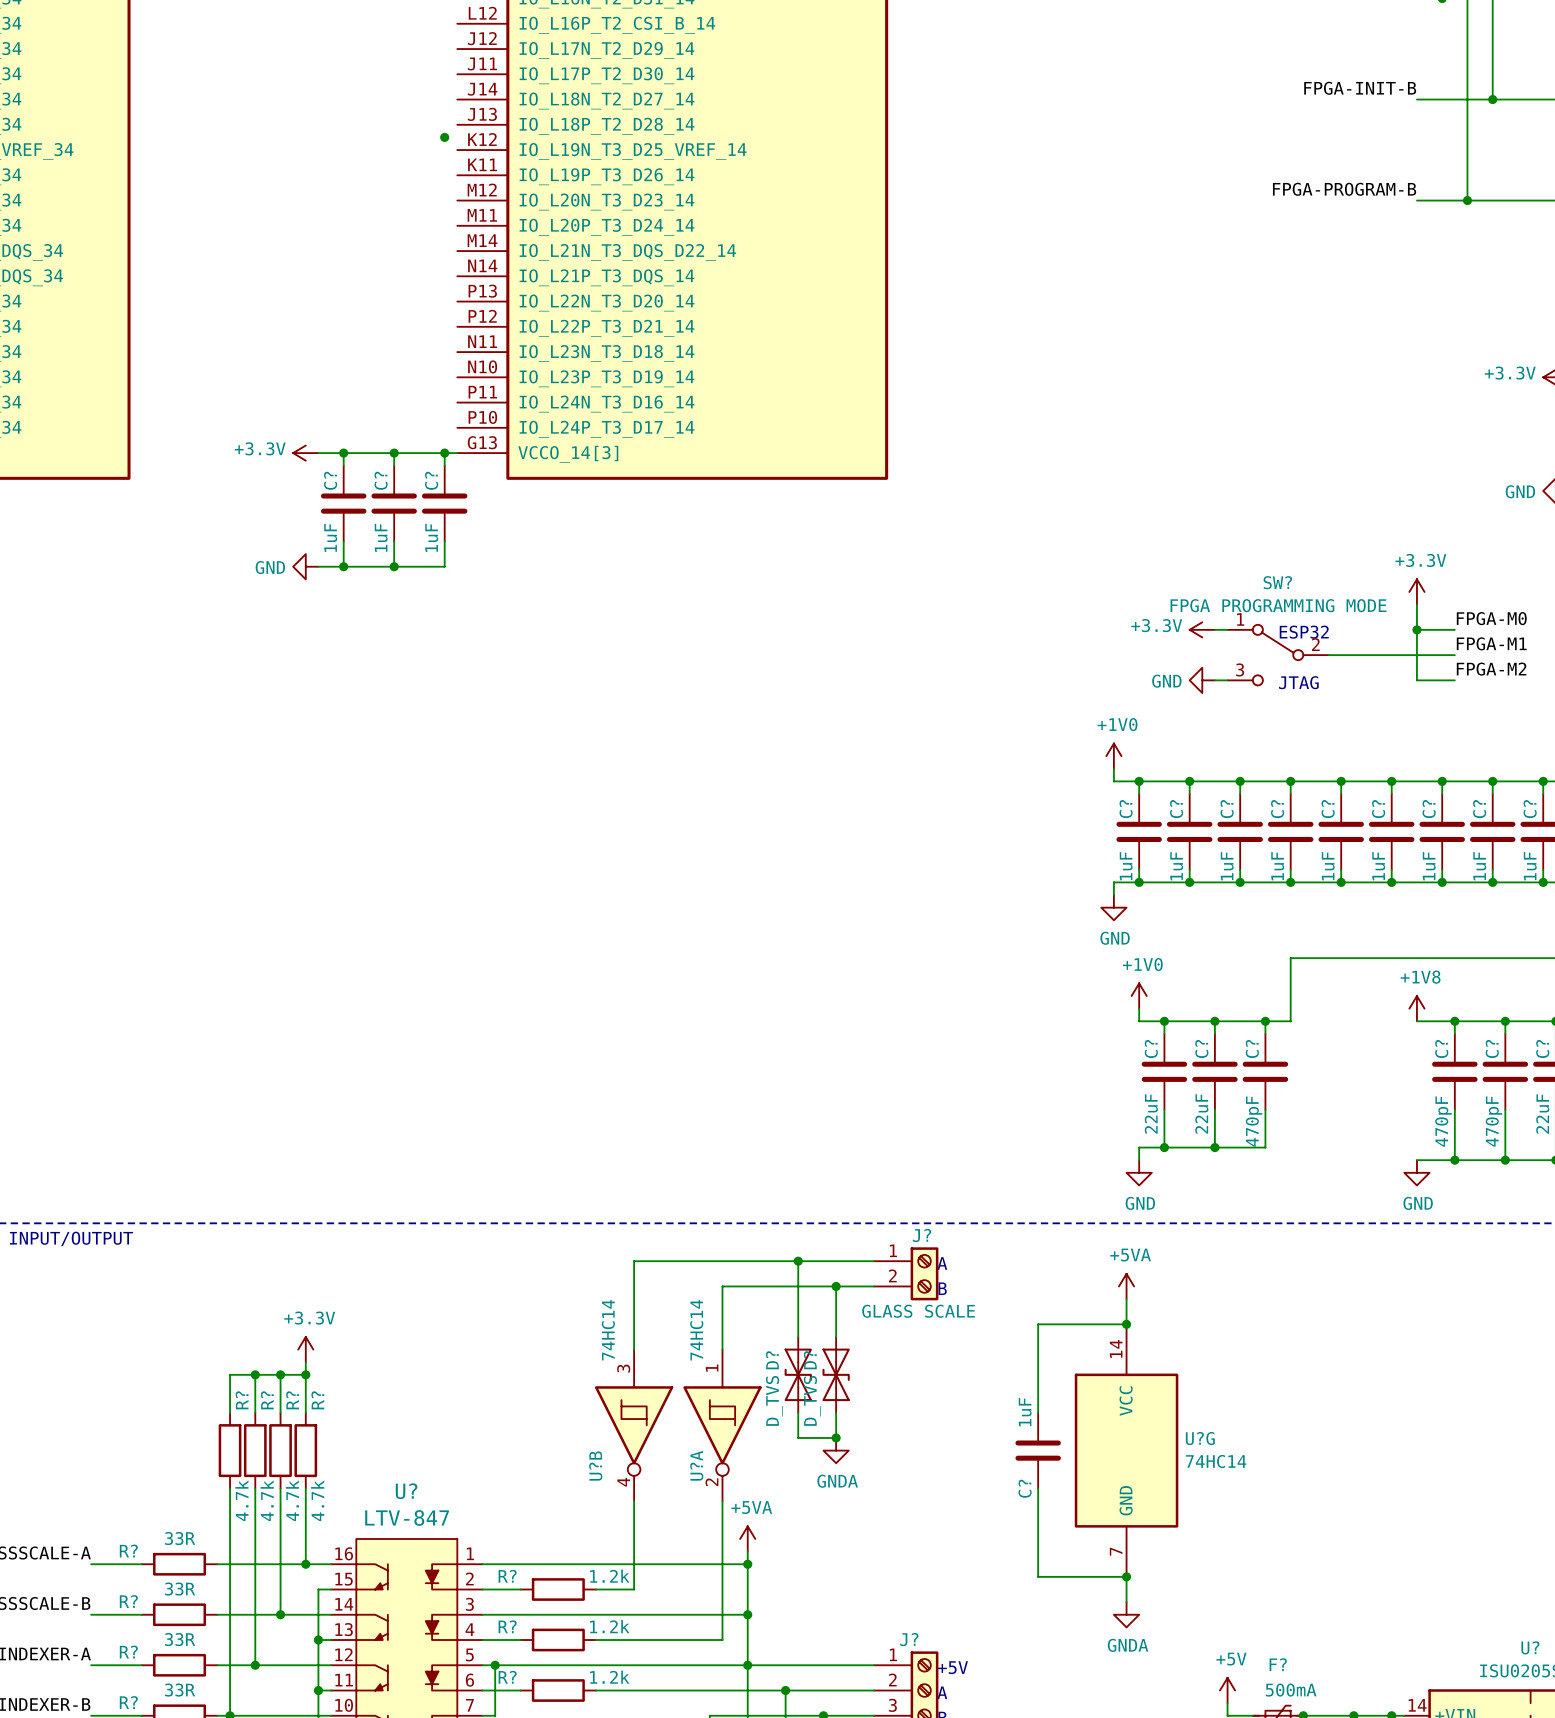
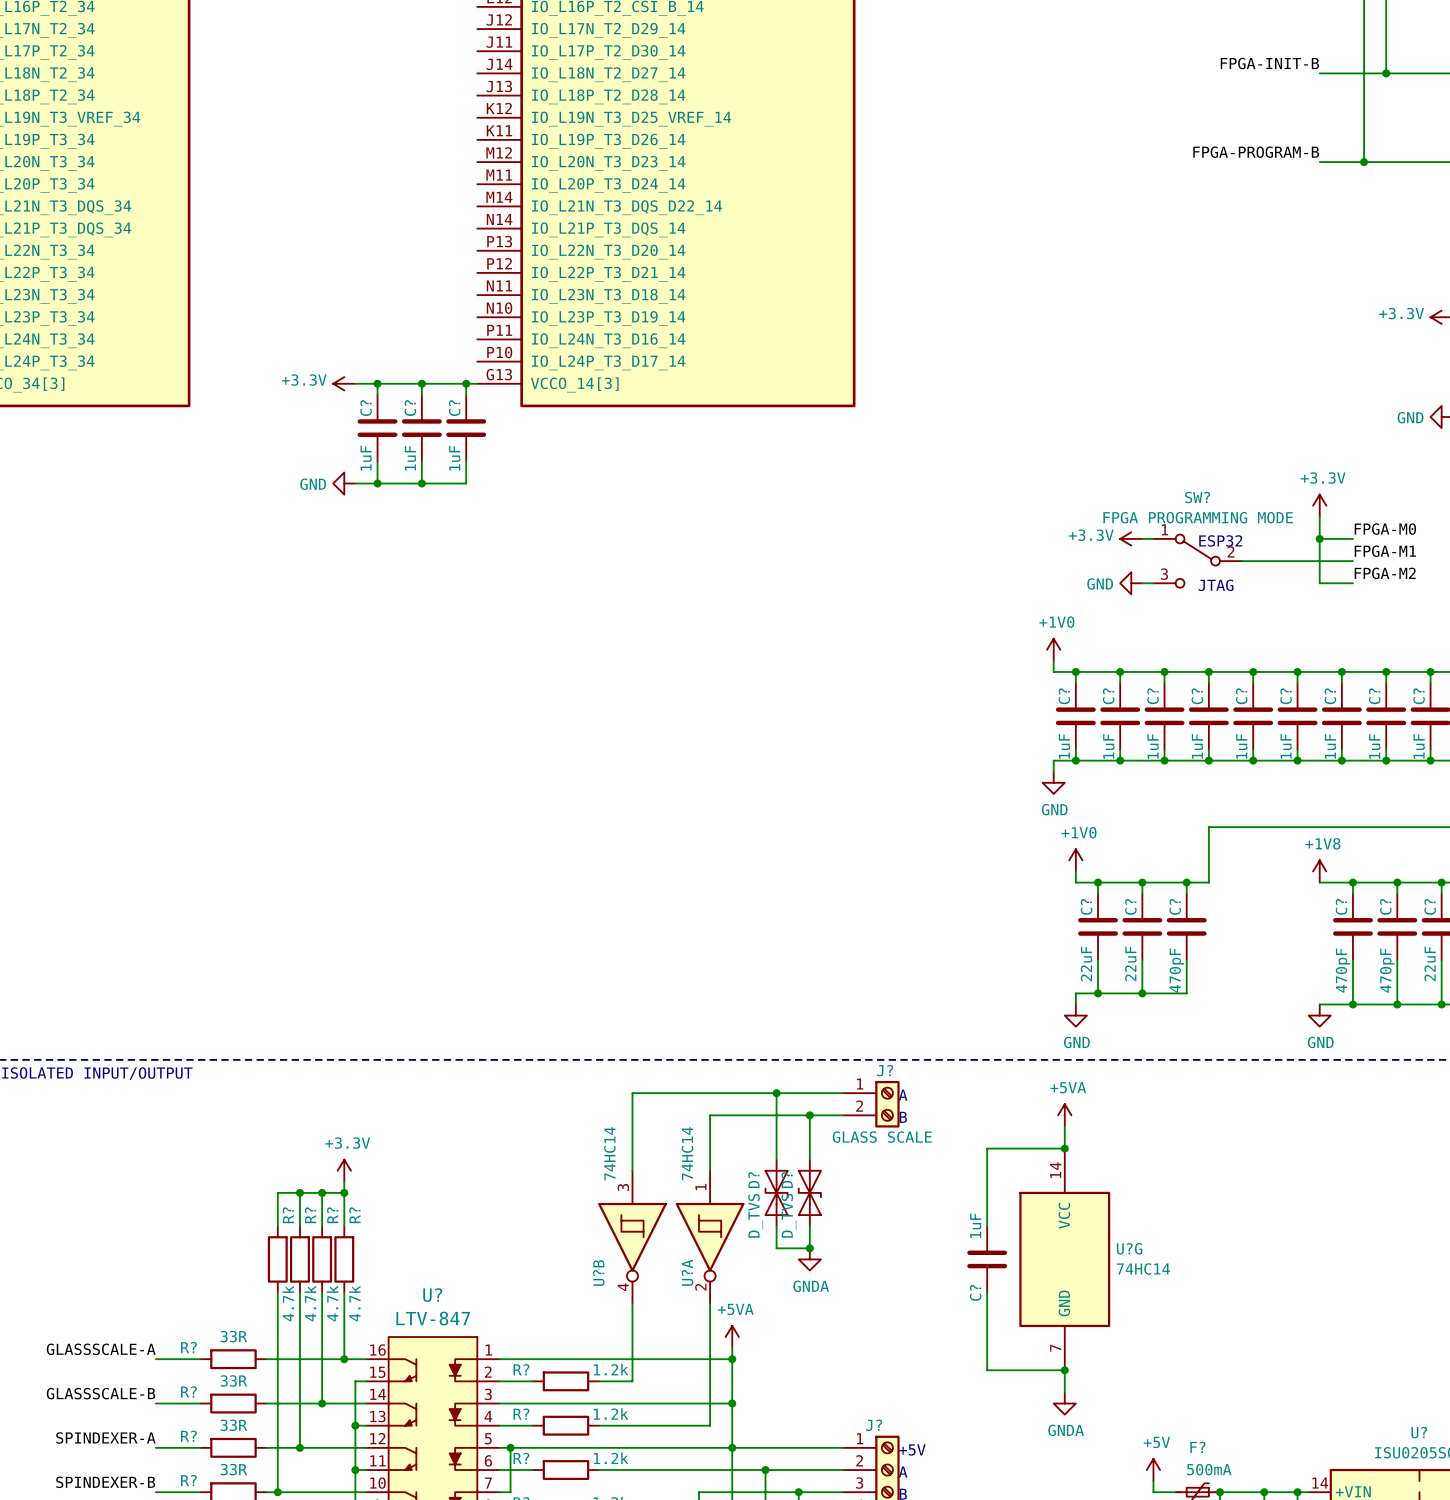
junction: (444, 137) -> none

